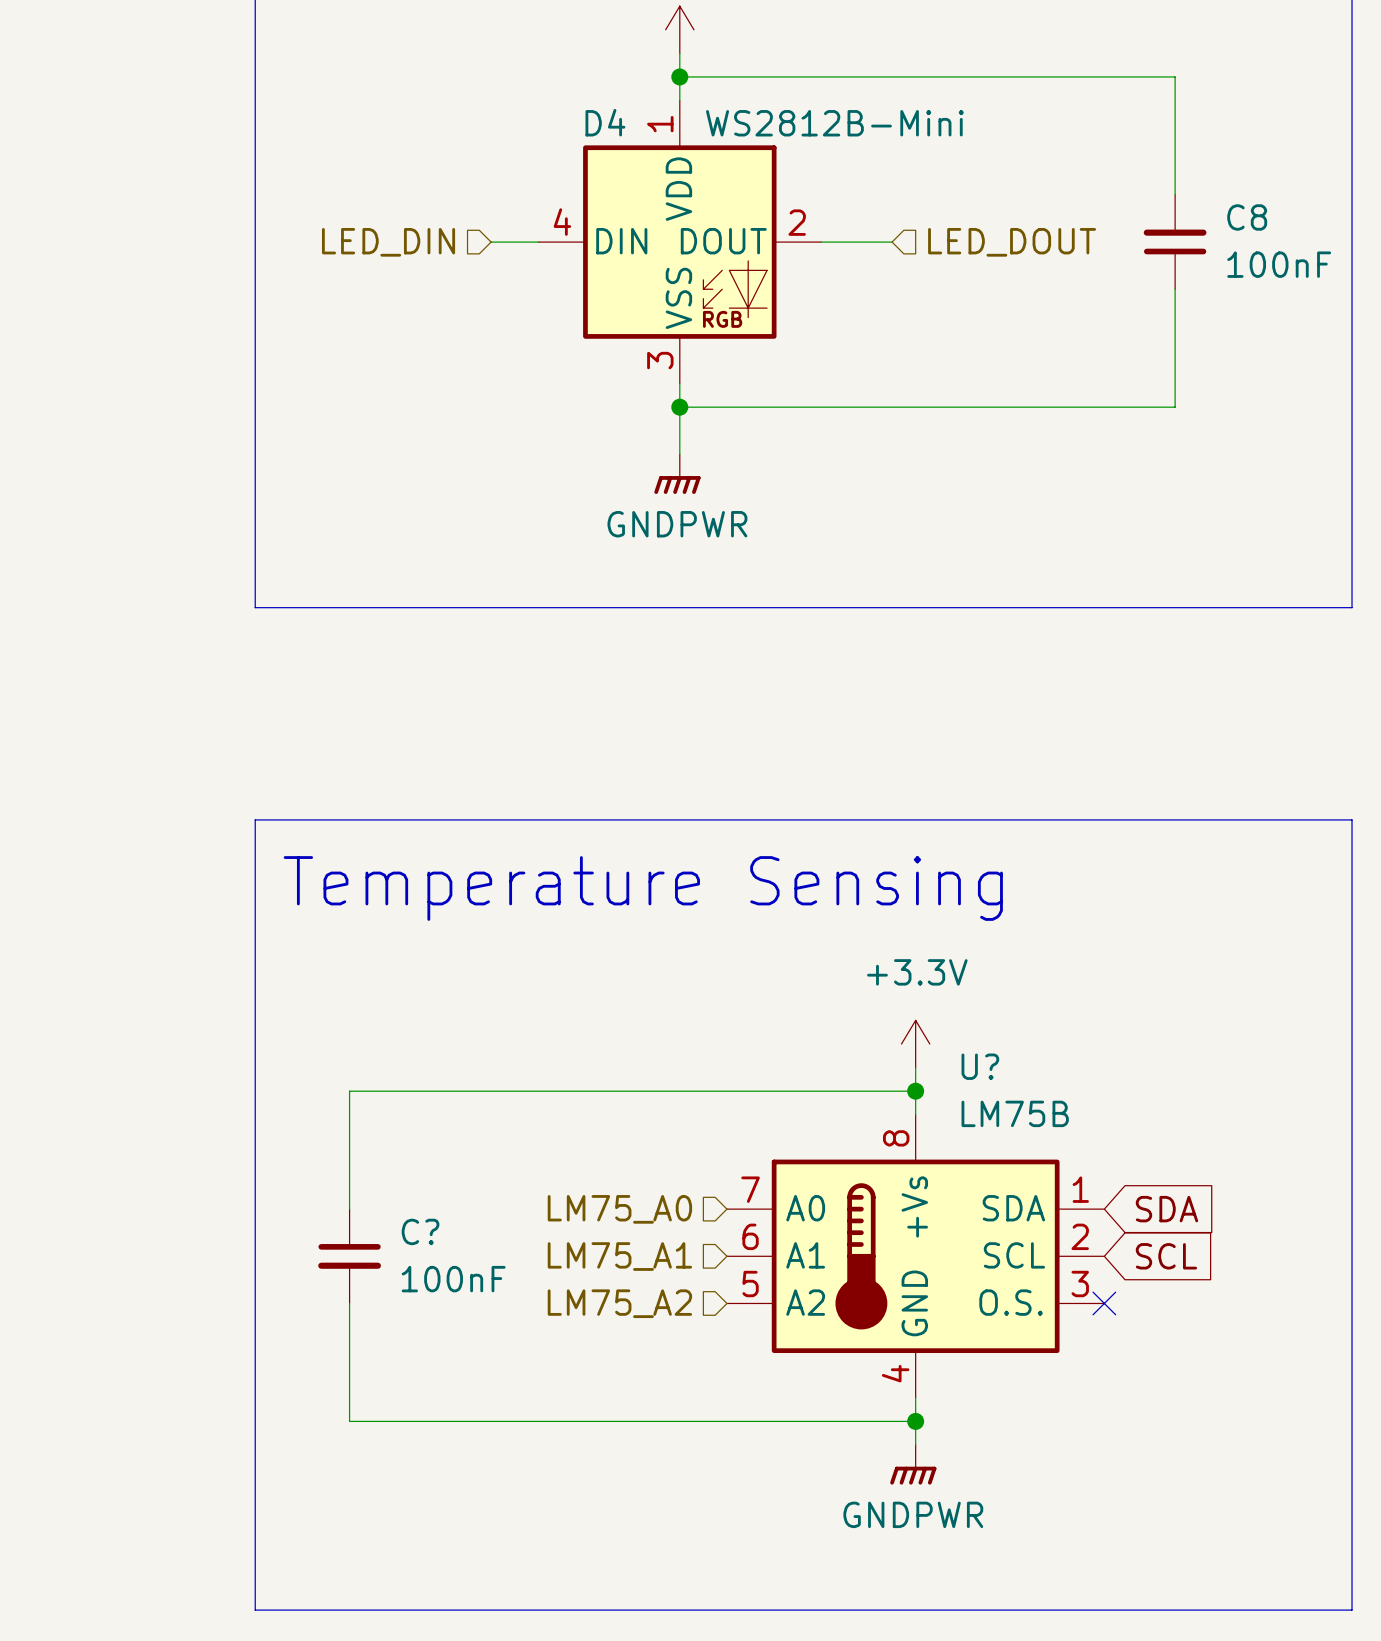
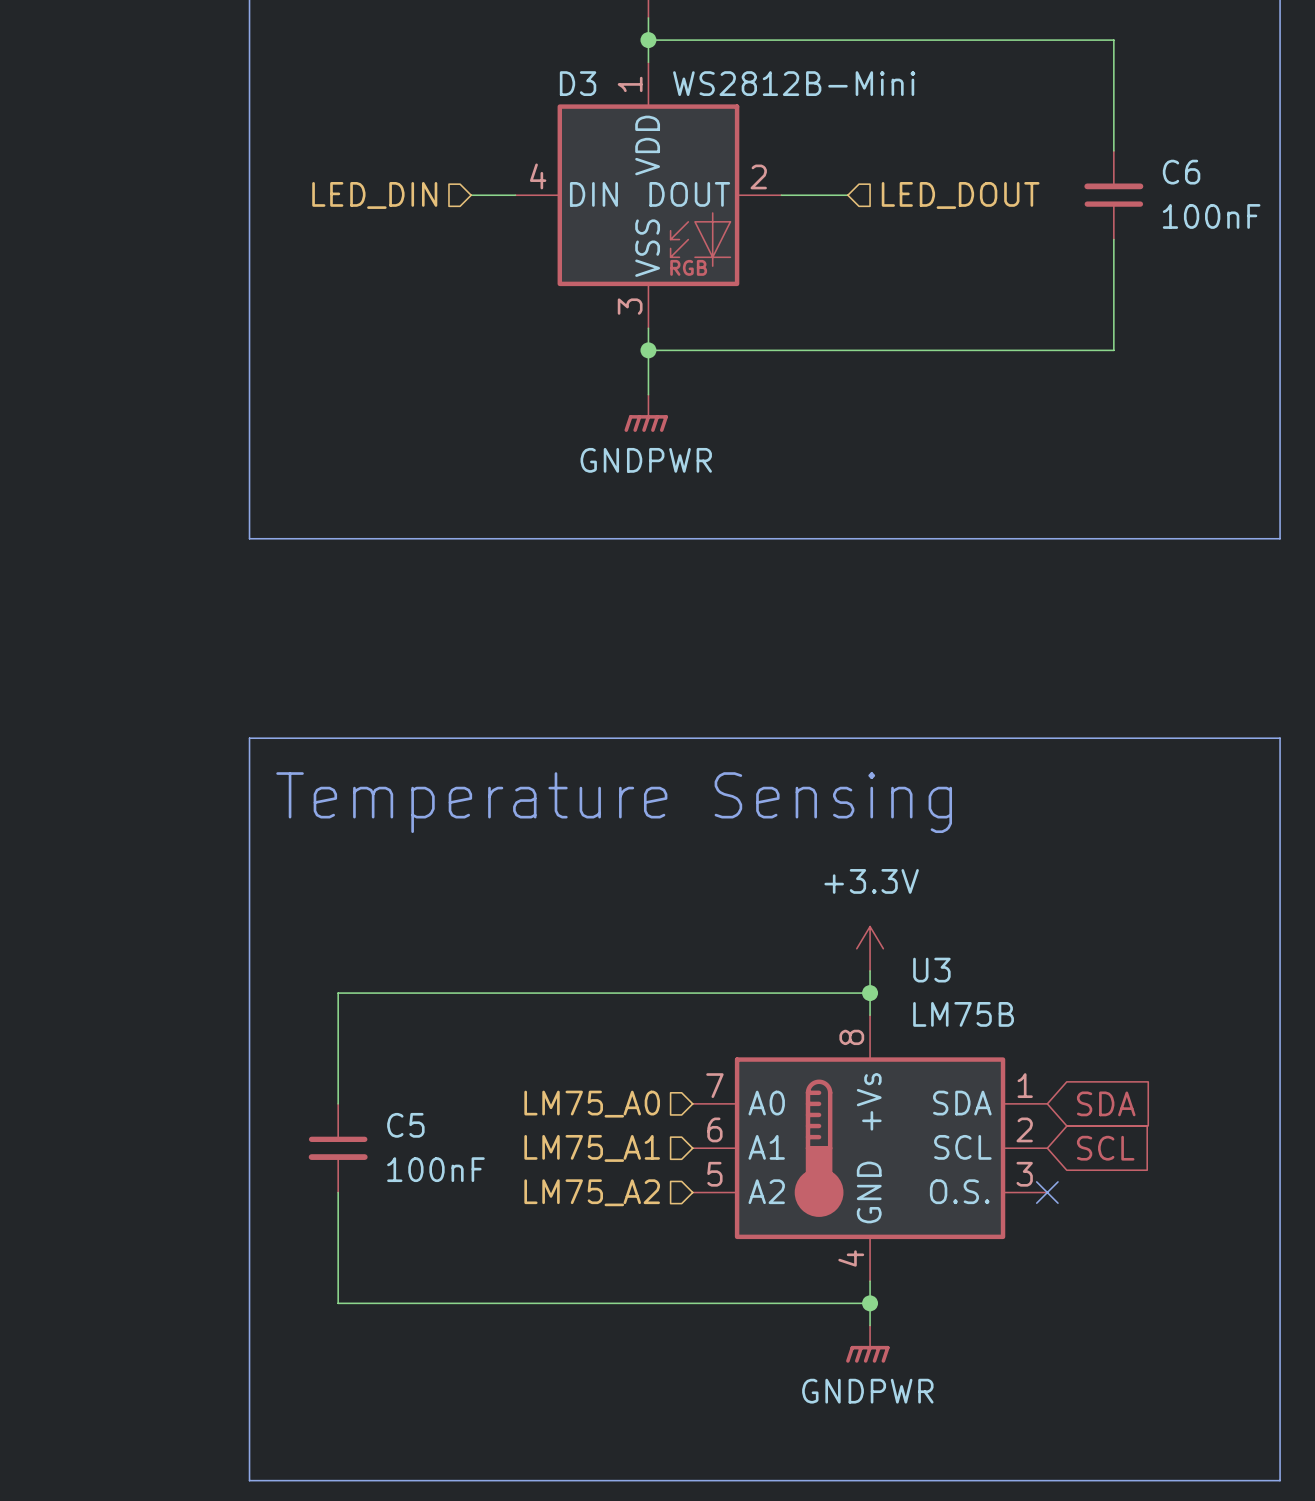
D4 name: D4 (605, 122) -> D3 (578, 83)
C8 name: C8 (1247, 217) -> C6 (1181, 172)
U? name: U? (980, 1066) -> U3 (931, 970)
C? name: C? (420, 1231) -> C5 (405, 1125)

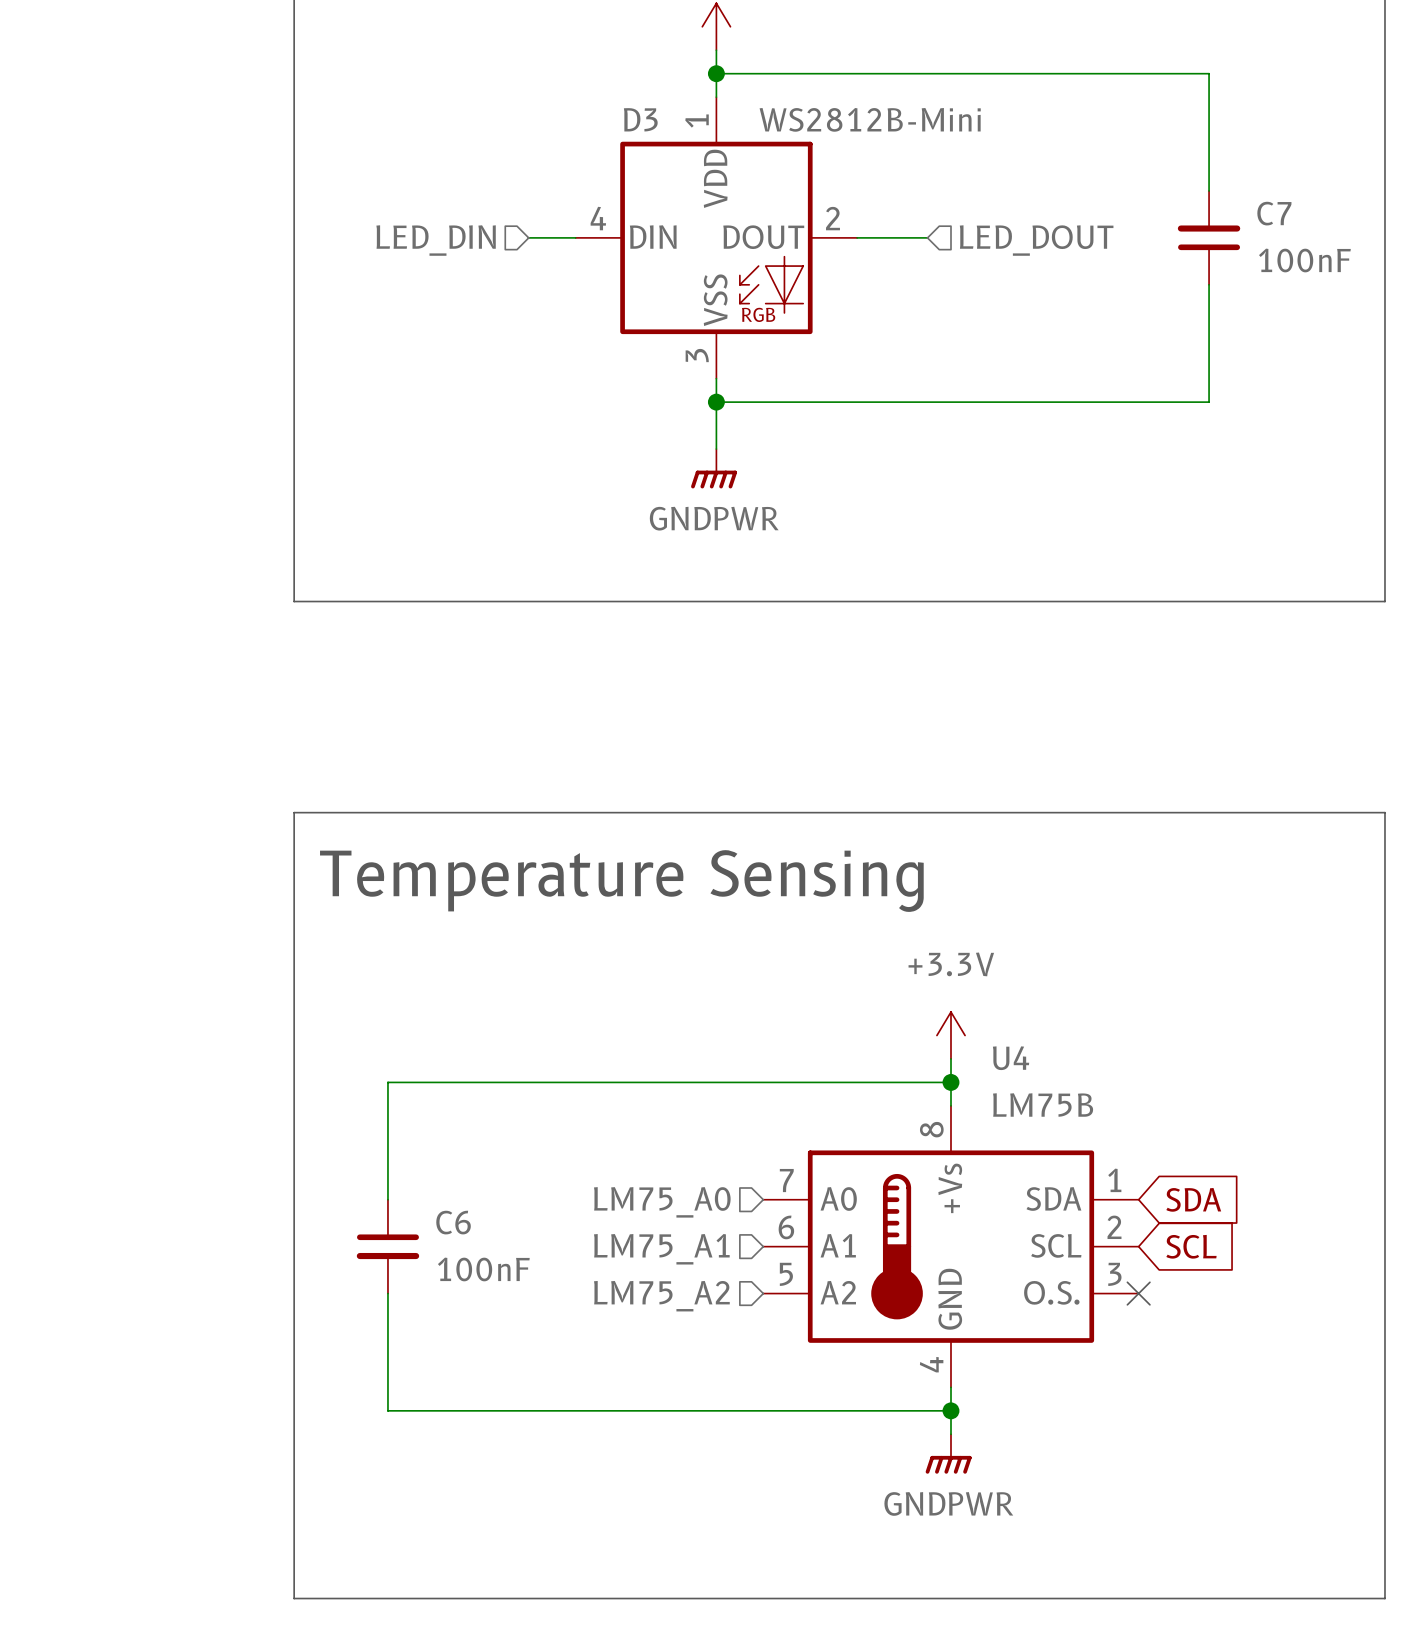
C6 name: C6 (1181, 172) -> C7 (1274, 213)
U3 name: U3 (931, 970) -> U4 (1011, 1058)
C5 name: C5 (405, 1125) -> C6 (453, 1222)

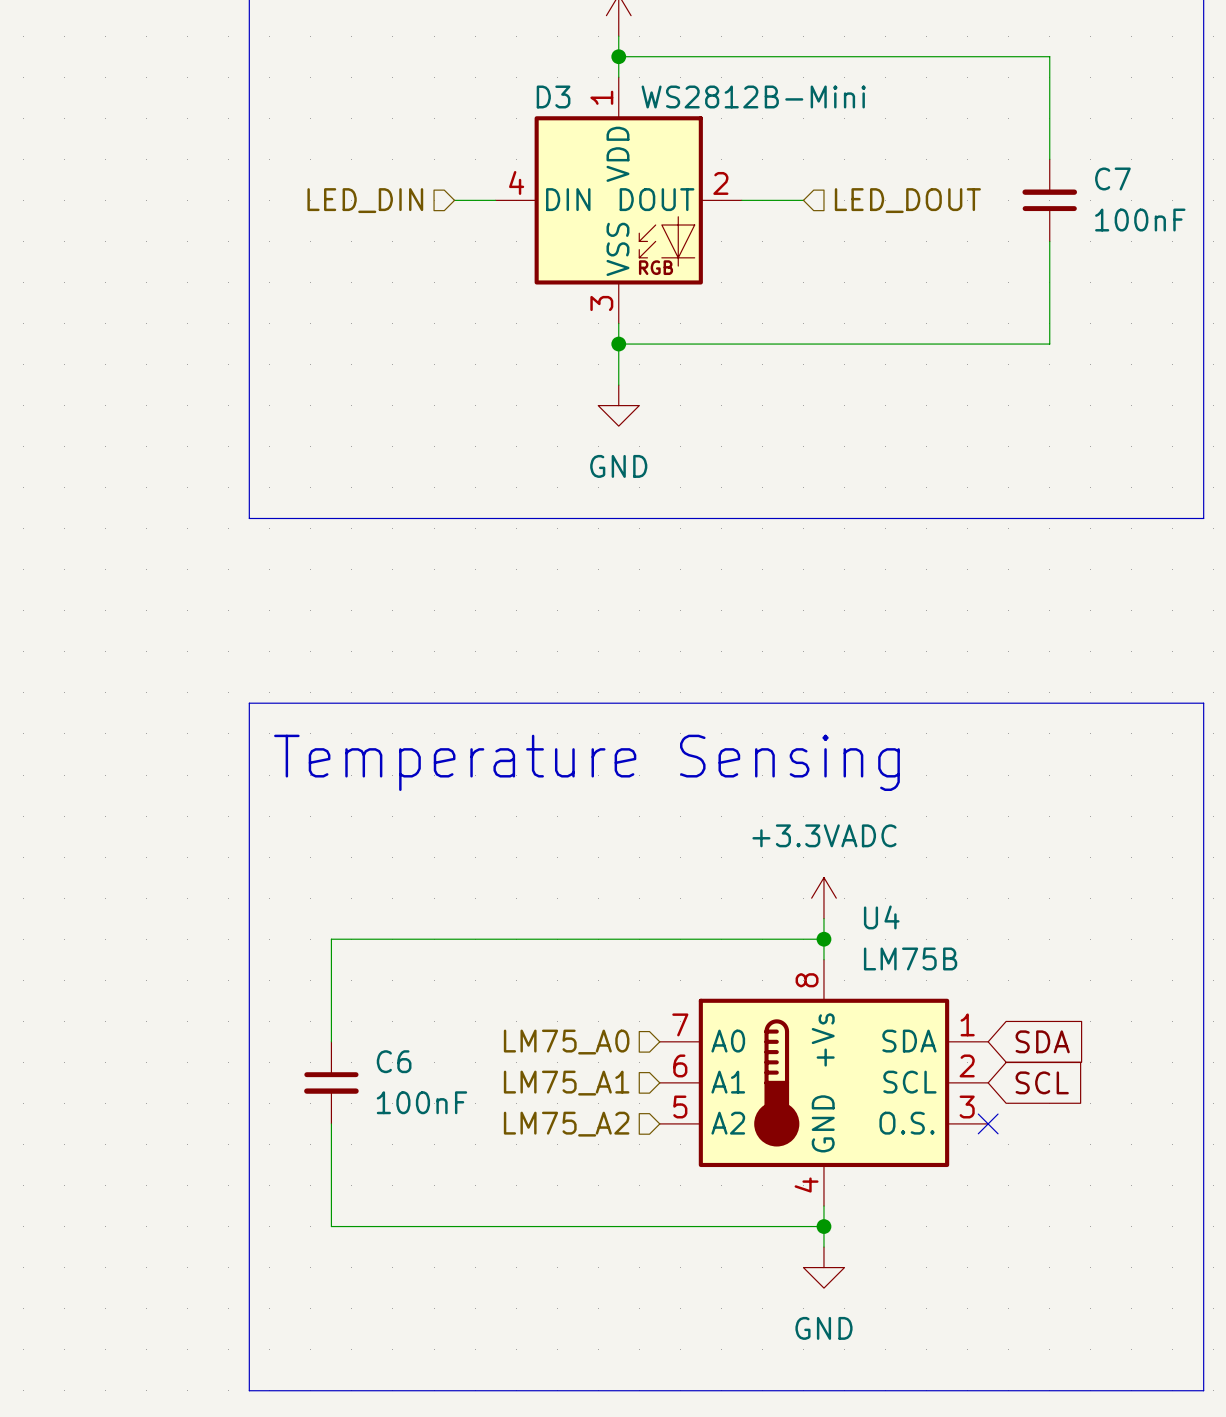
power symbol: GNDPWR (714, 468) -> GND (618, 405)
power symbol: +3.3V (950, 1035) -> +3.3VADC (823, 898)
power symbol: GNDPWR (948, 1454) -> GND (823, 1267)

